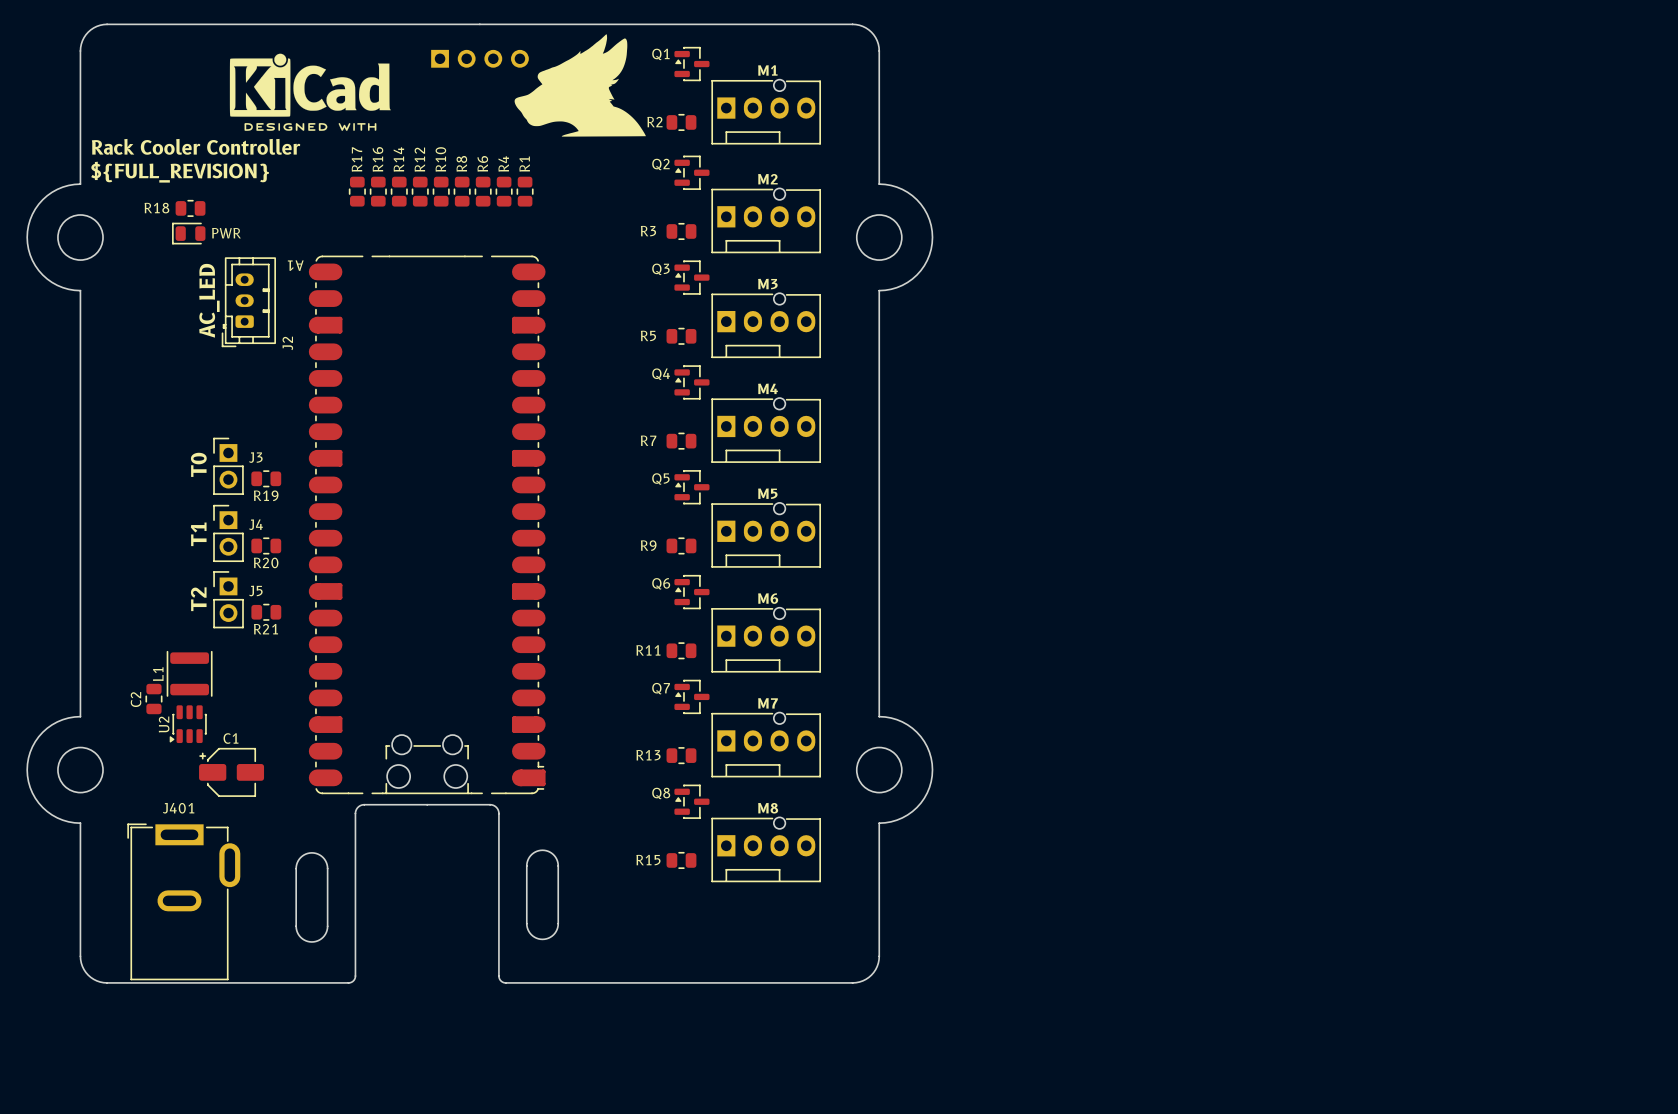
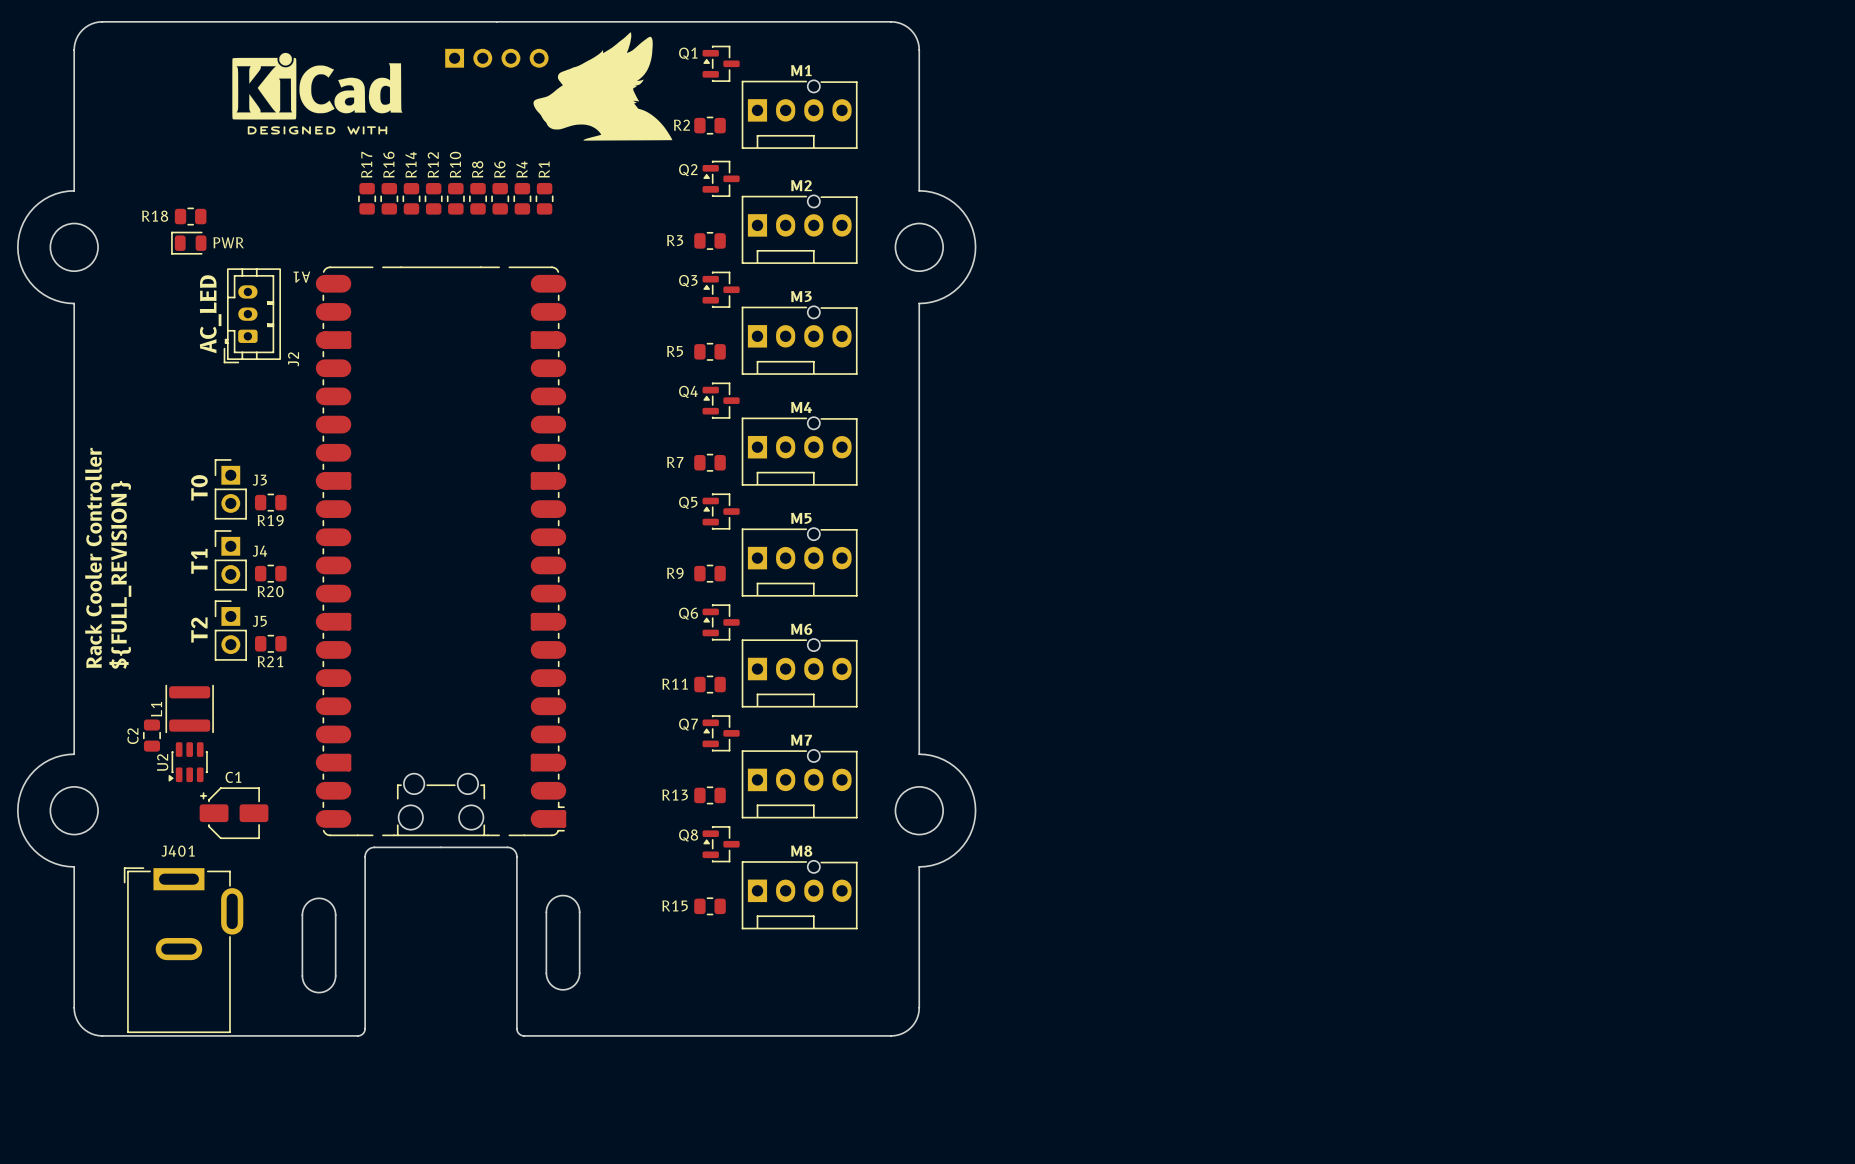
text: Rack Cooler Controller (196, 146) -> none
text: ${FULL_REVISION} (180, 172) -> none
text: none -> Rack Cooler Controller (93, 557)
text: none -> ${FULL_REVISION} (120, 574)

